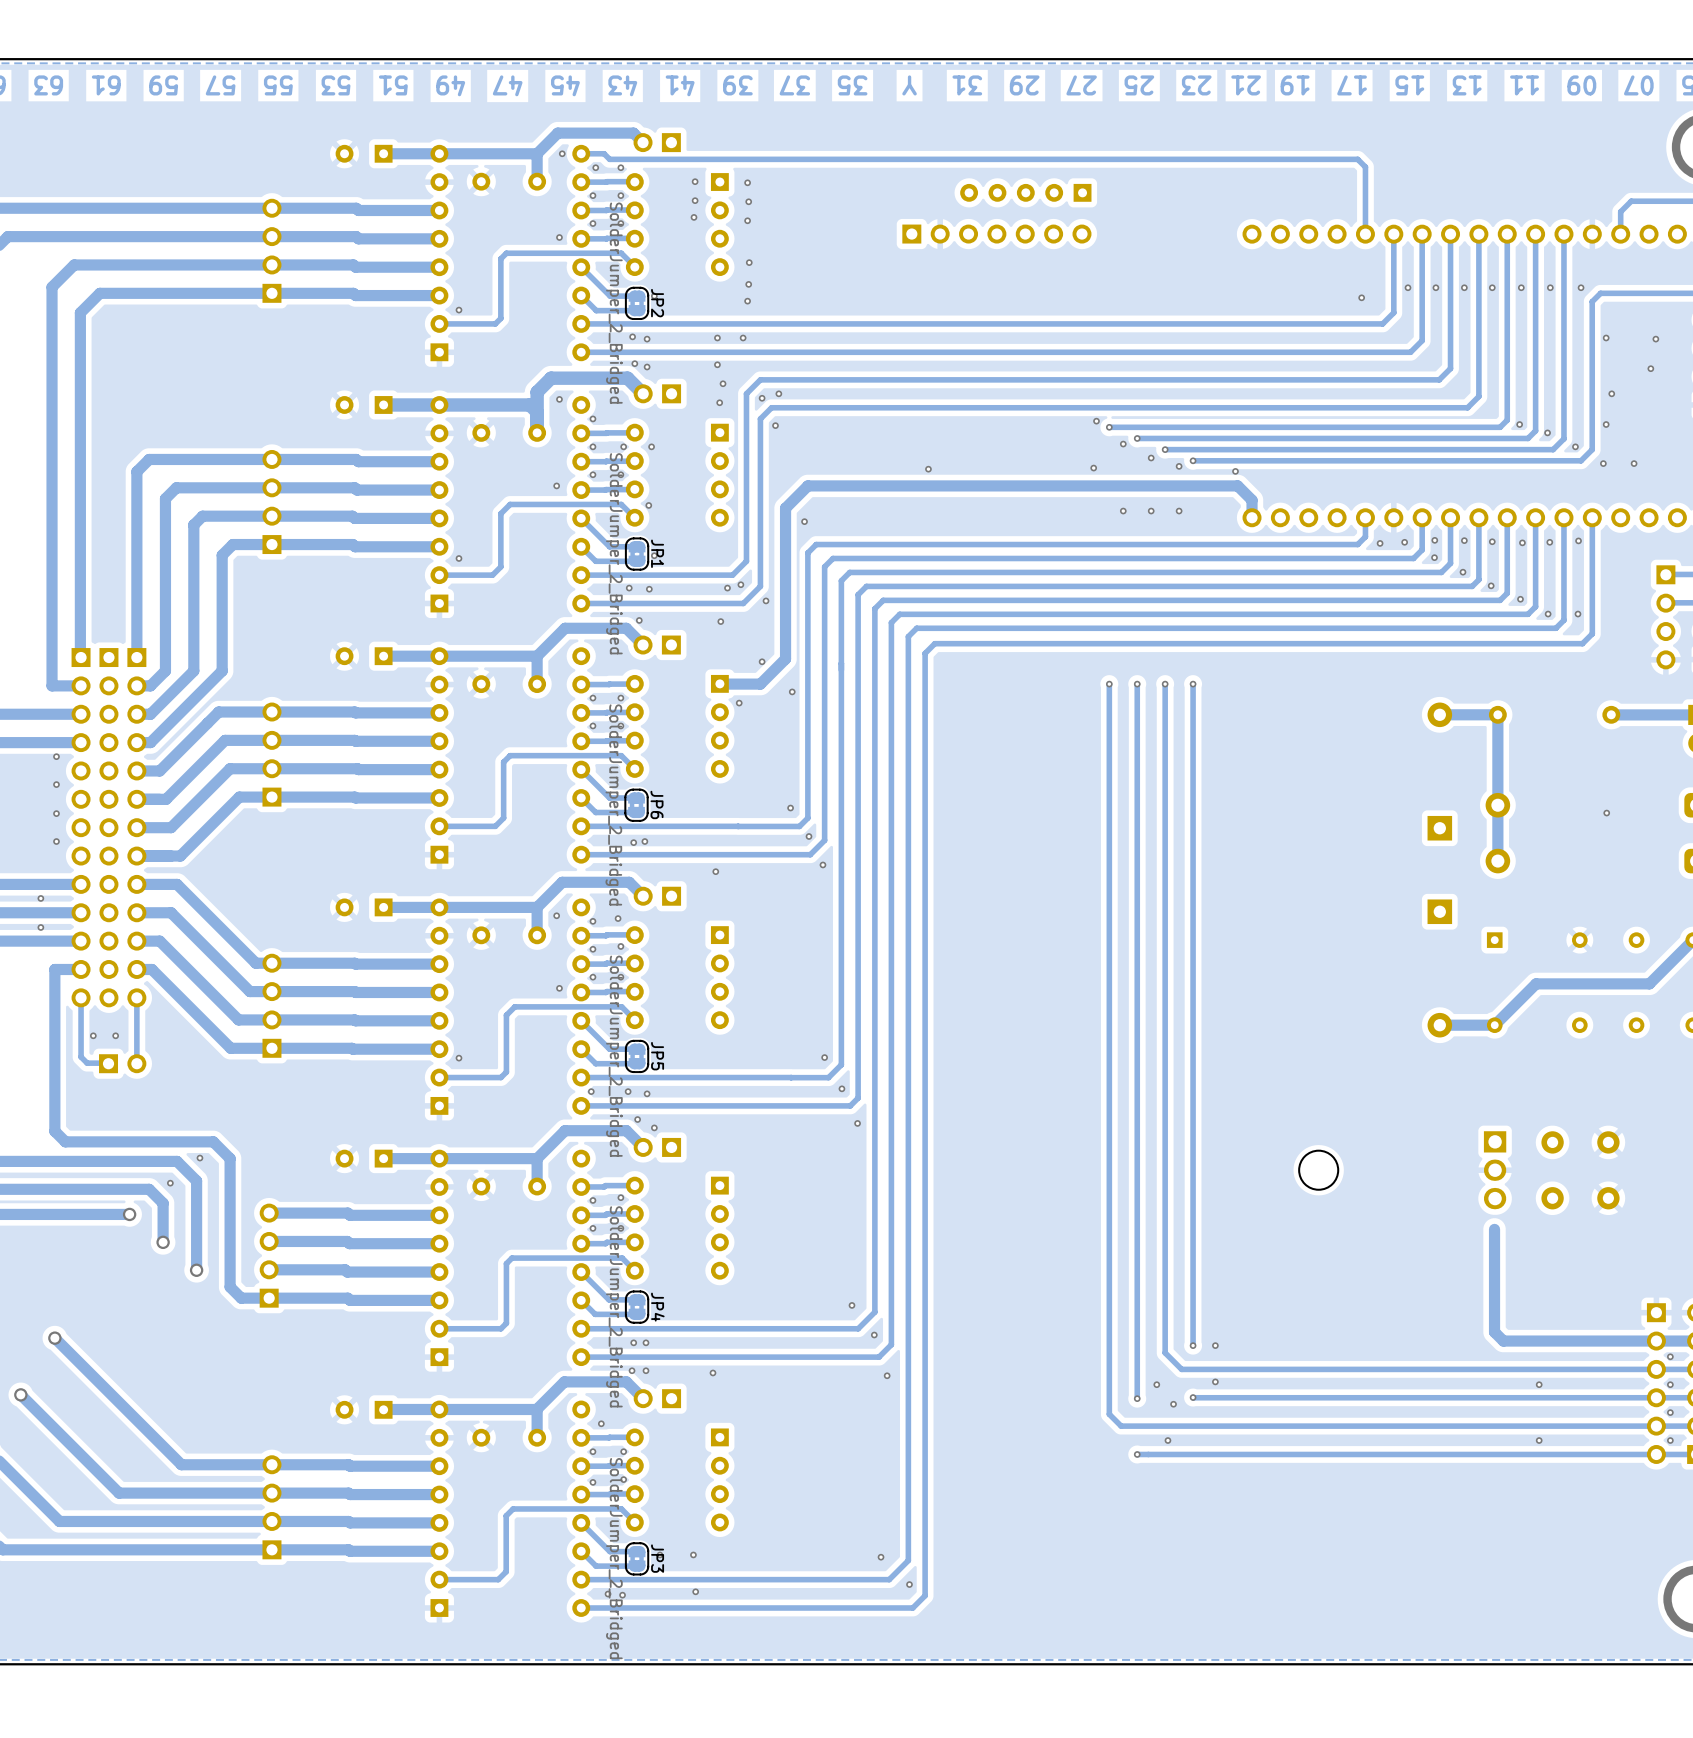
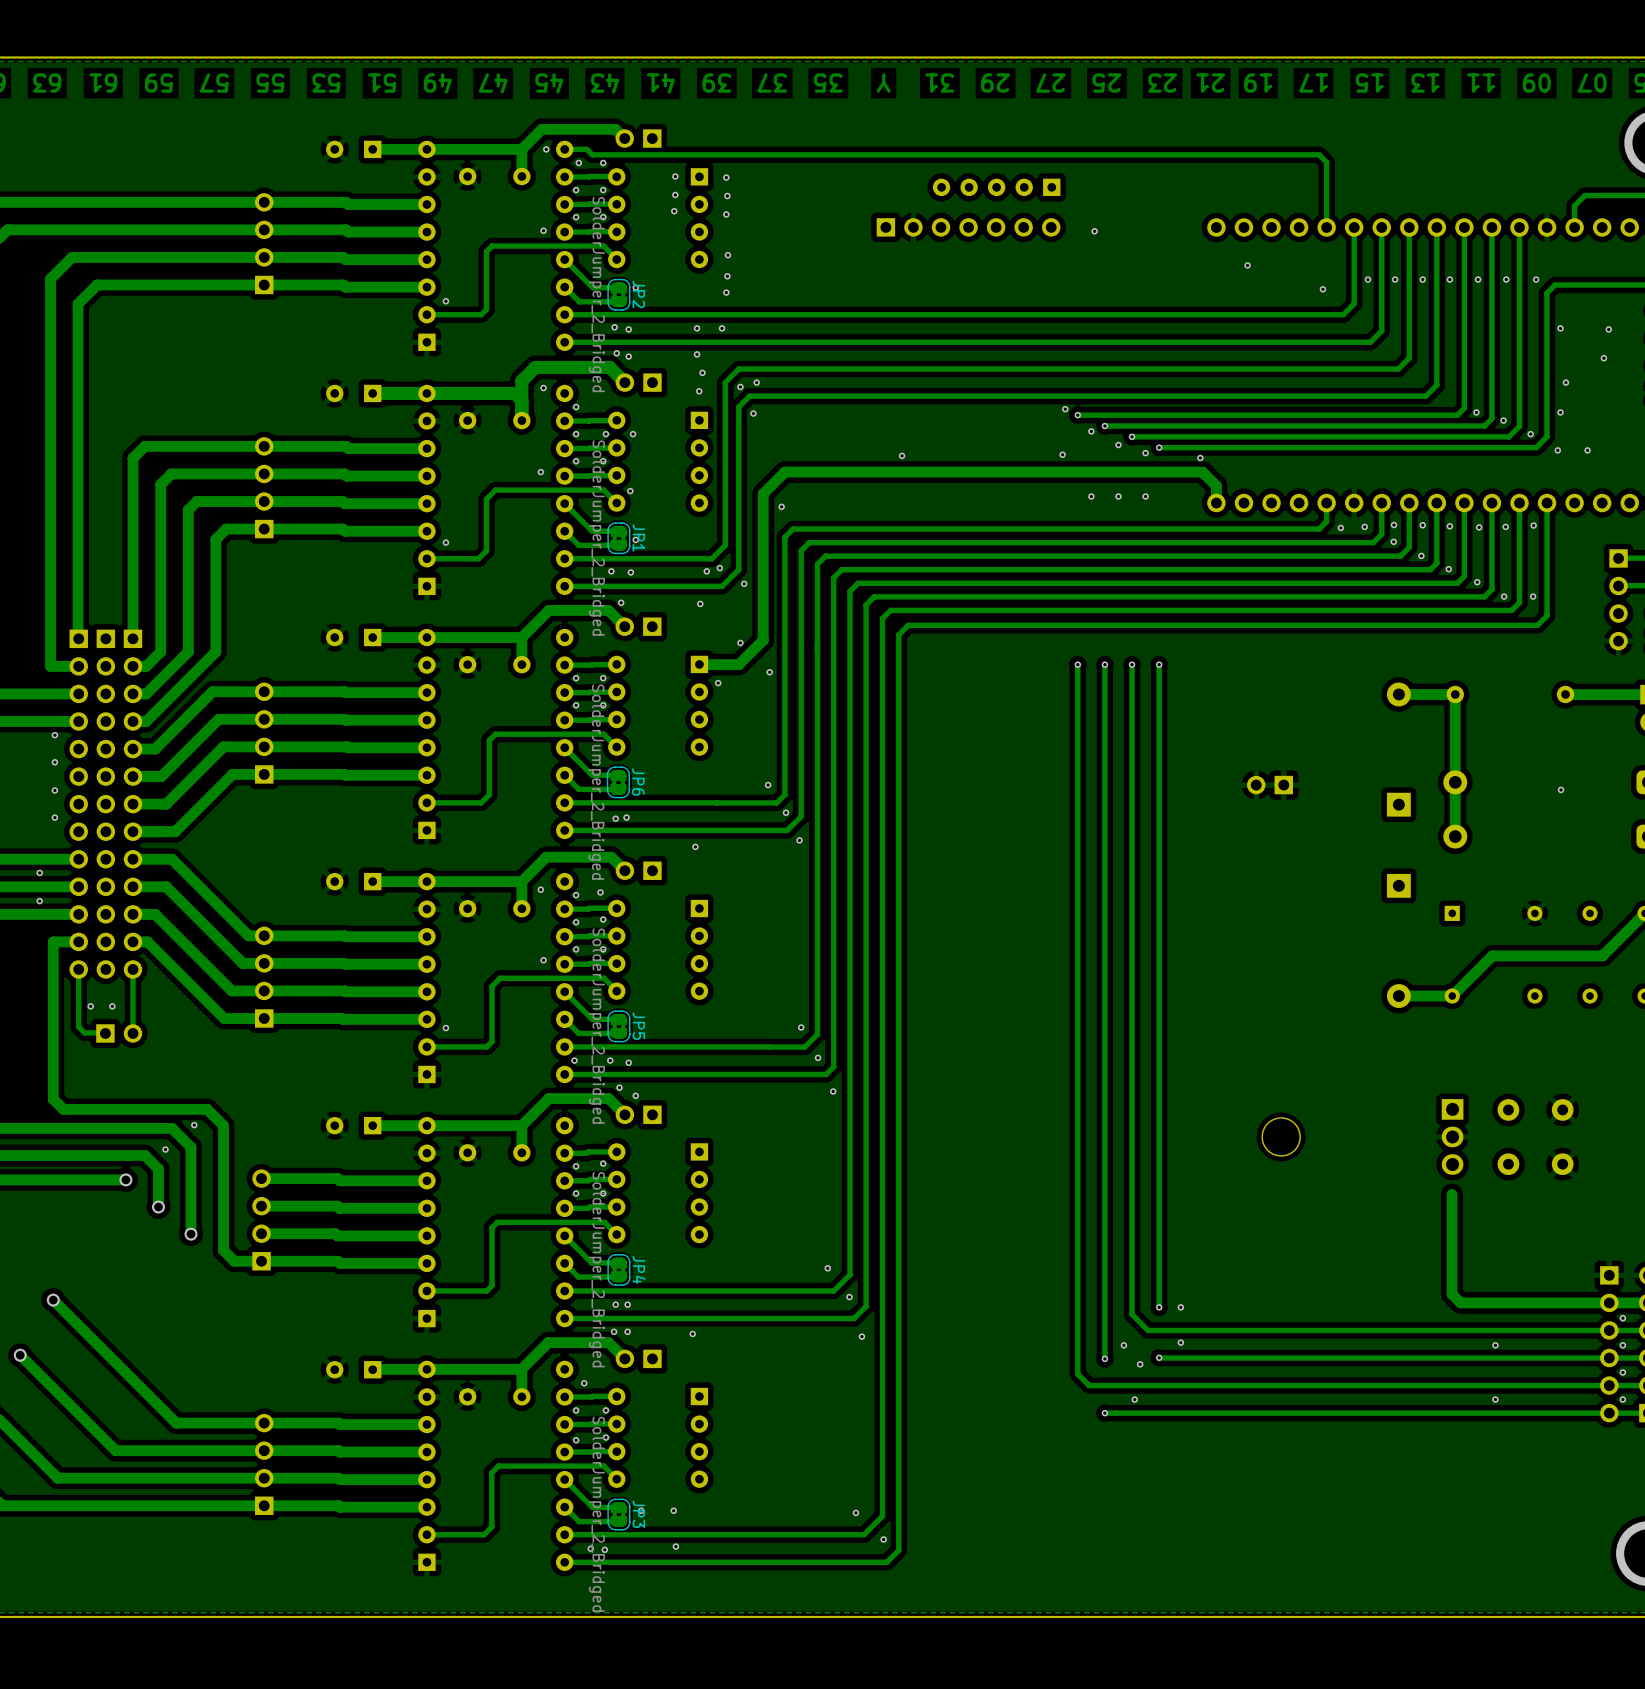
via: none -> (1094, 231)
via: none -> (1247, 265)
part: none -> (1270, 785)

